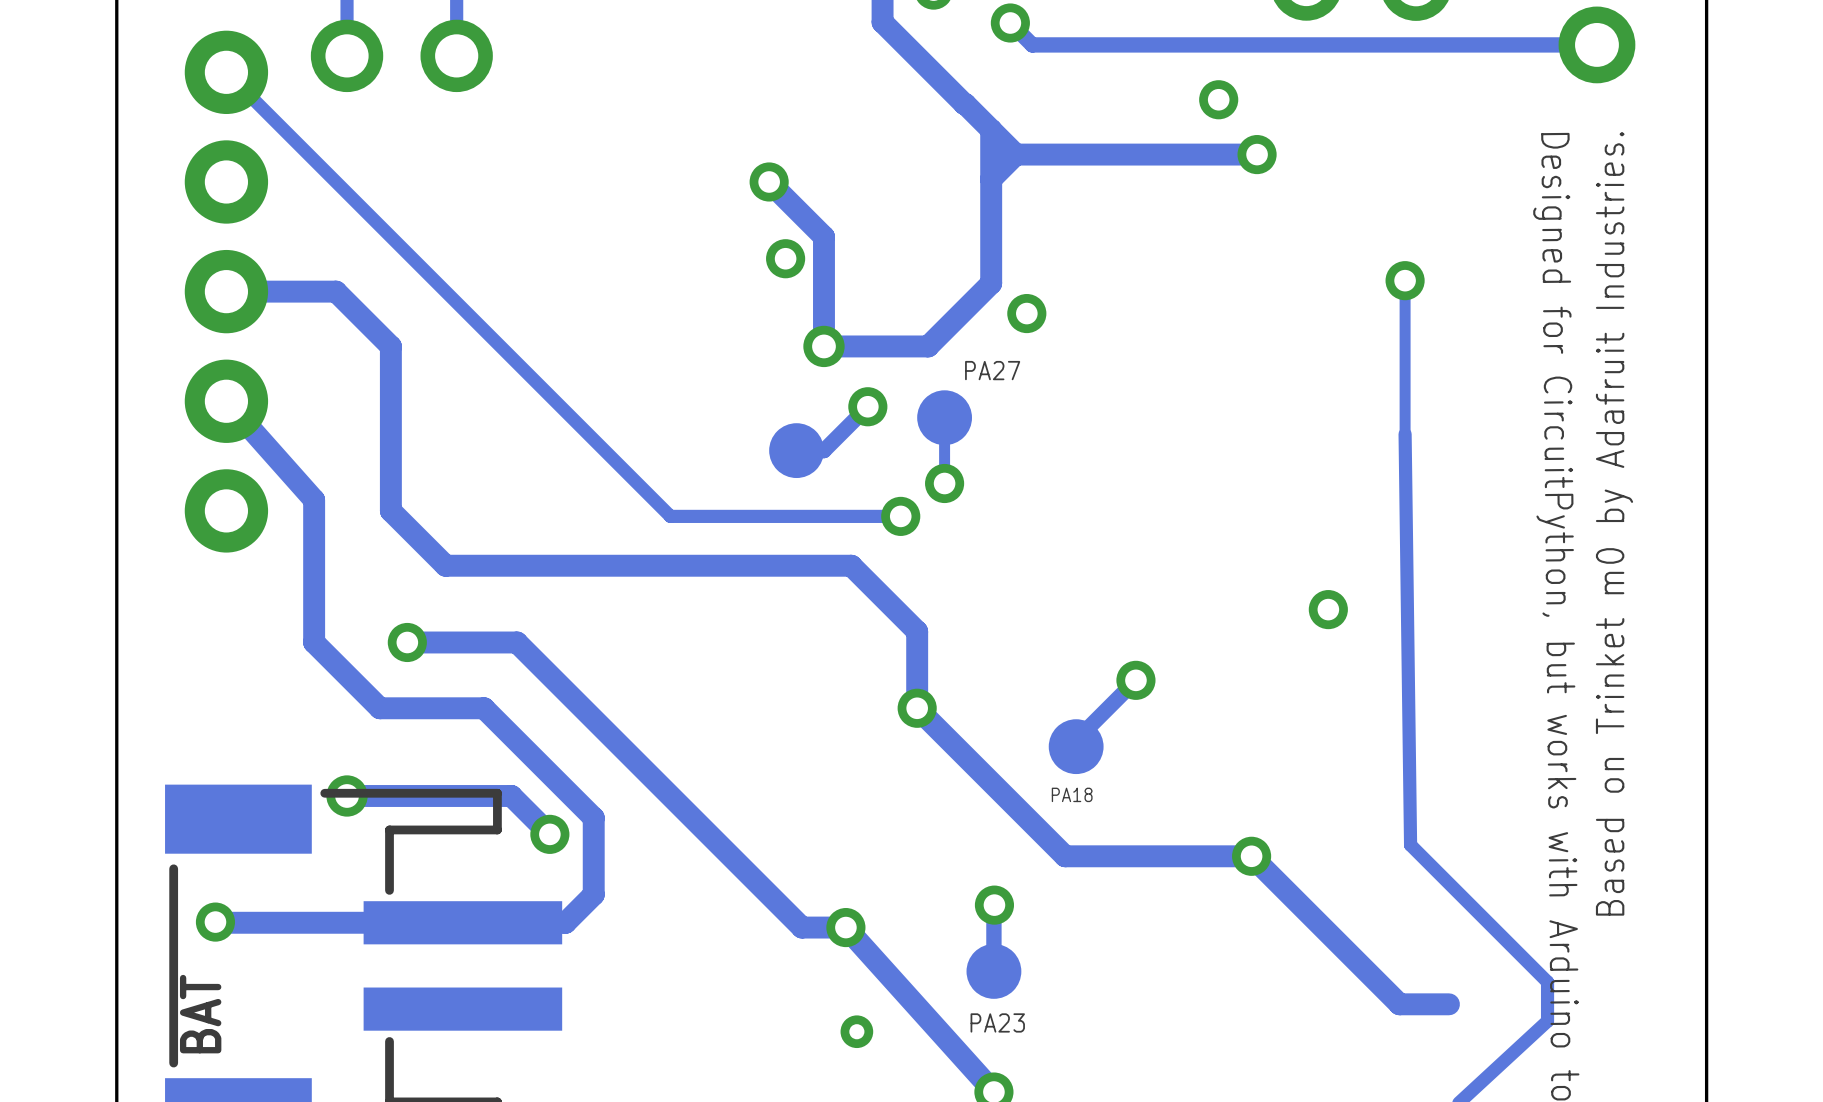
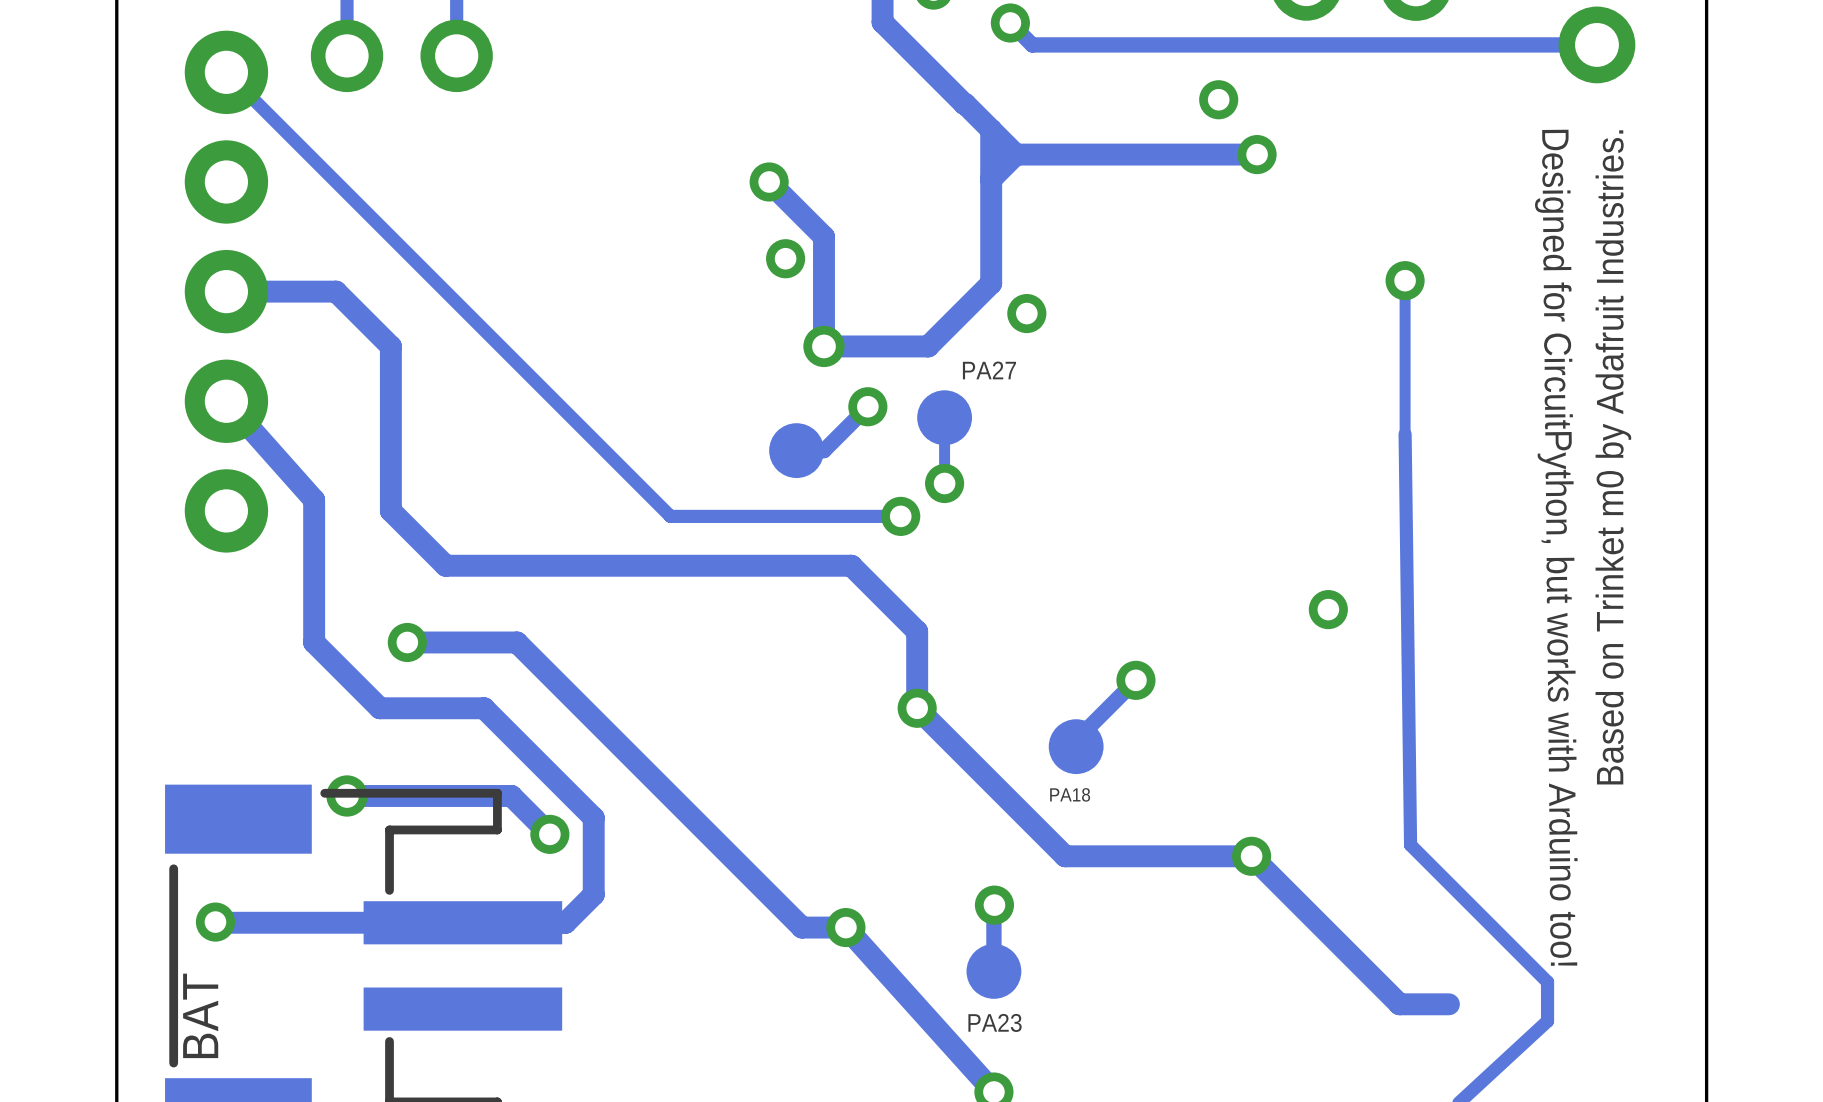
via: (856, 1031) -> none

